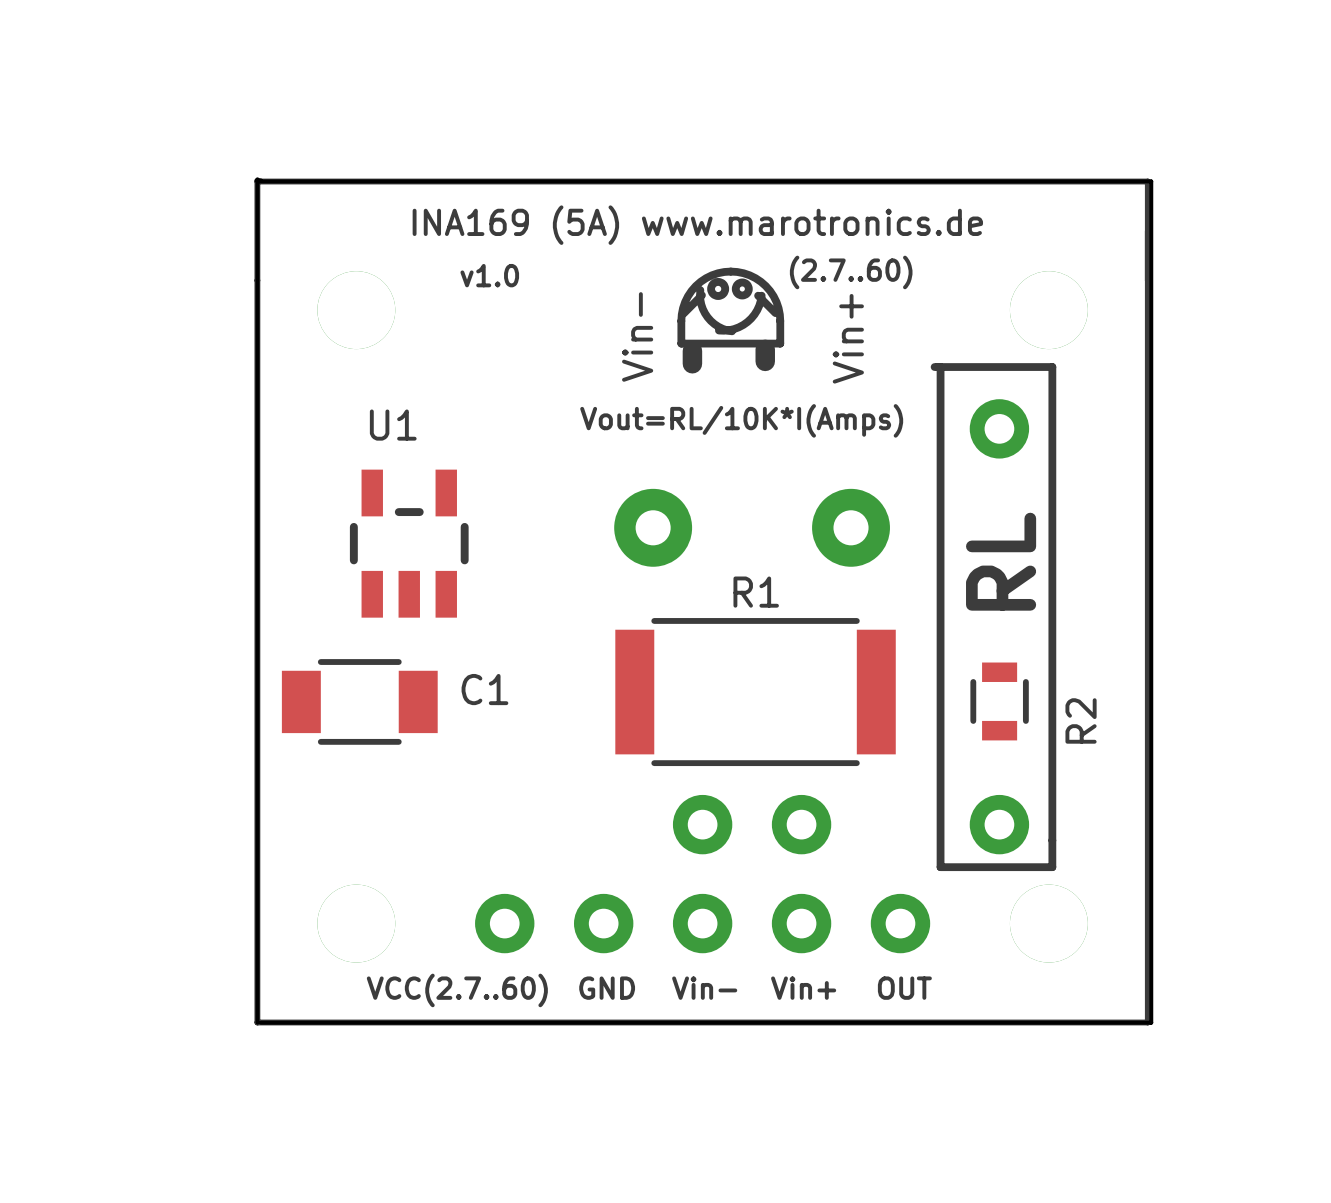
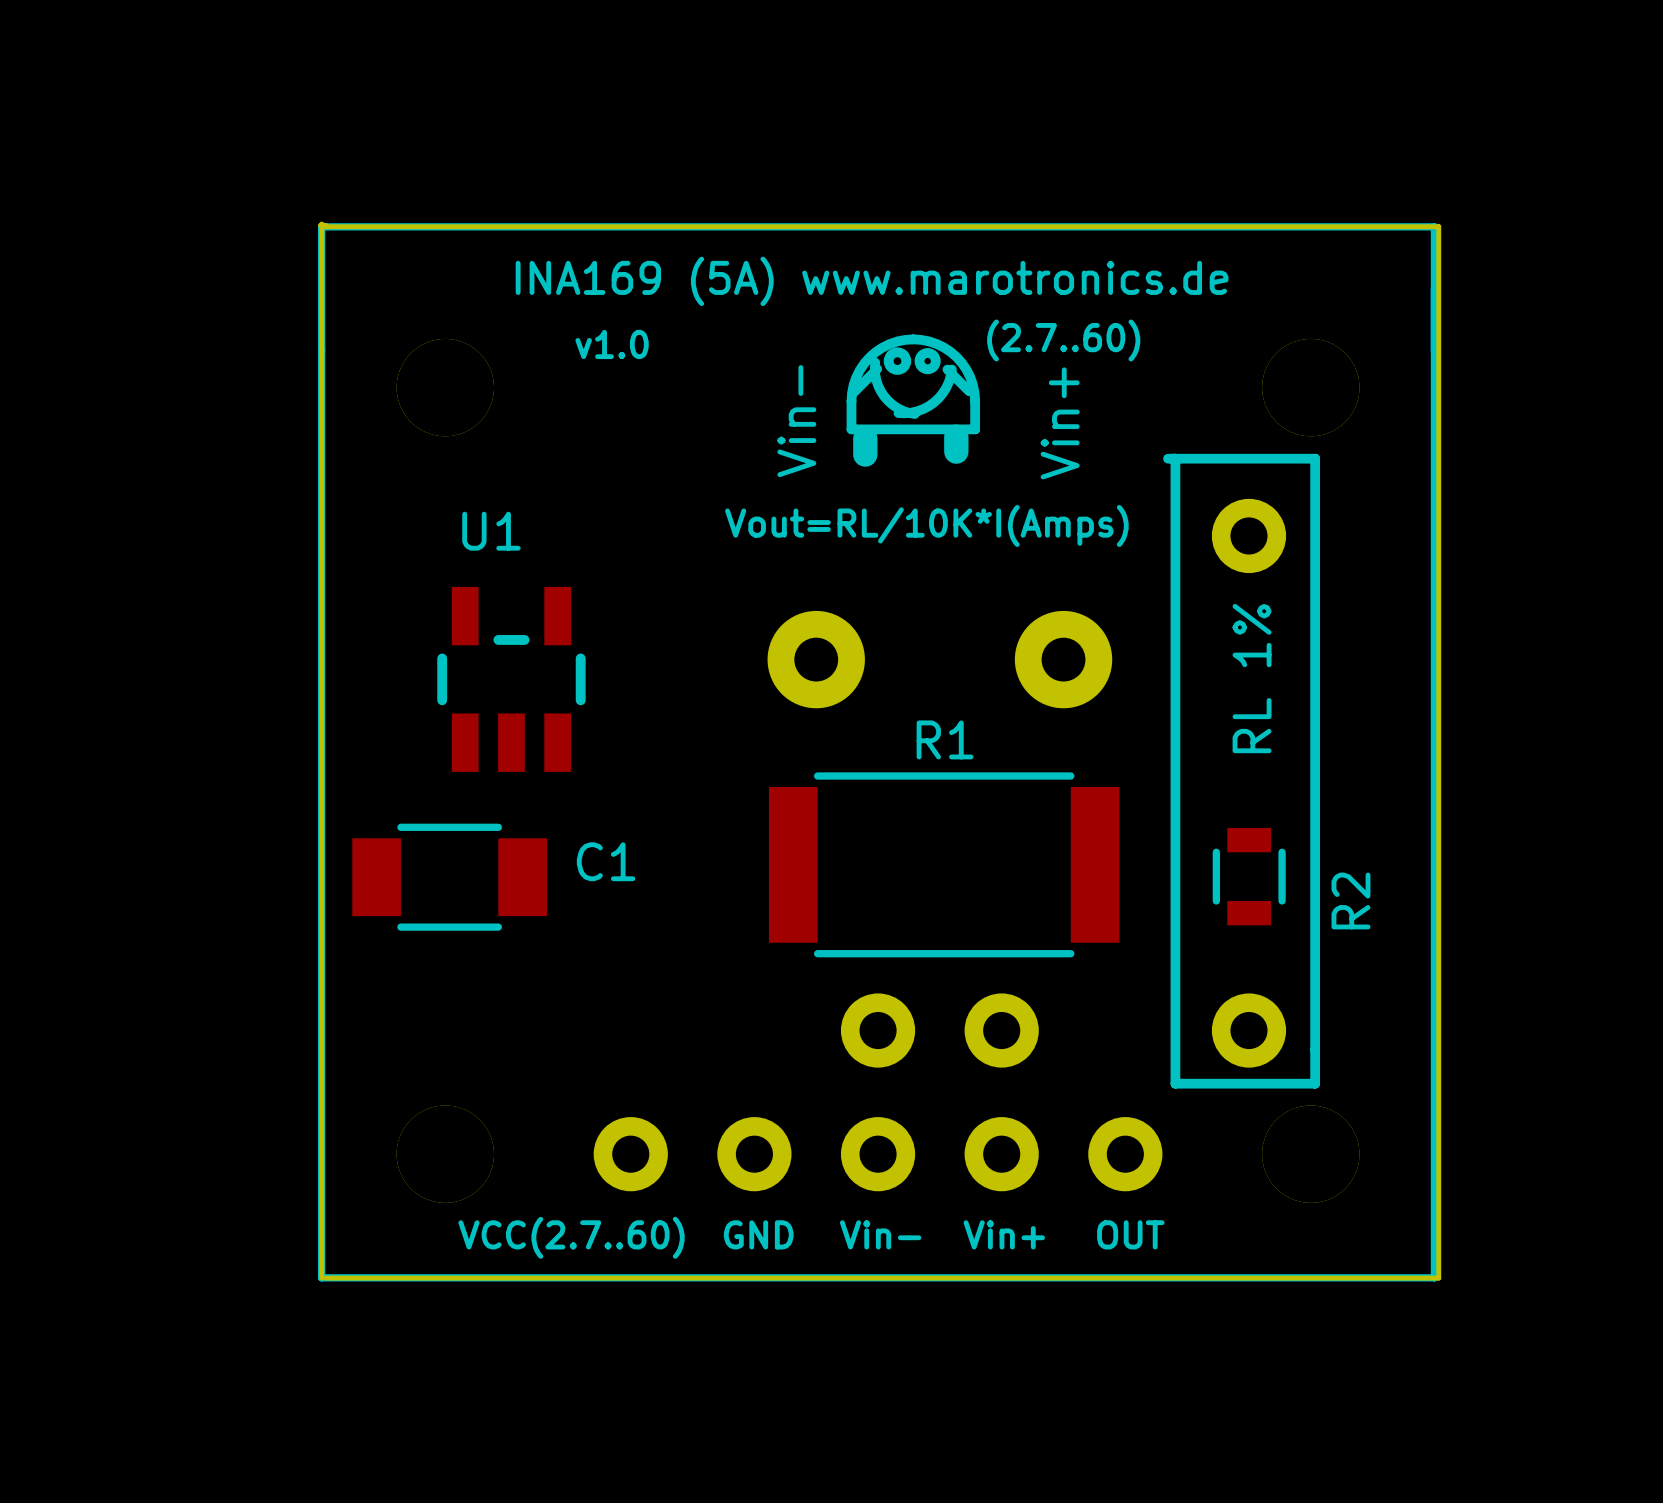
text: RL (1001, 561) -> RL 1% (1252, 678)

